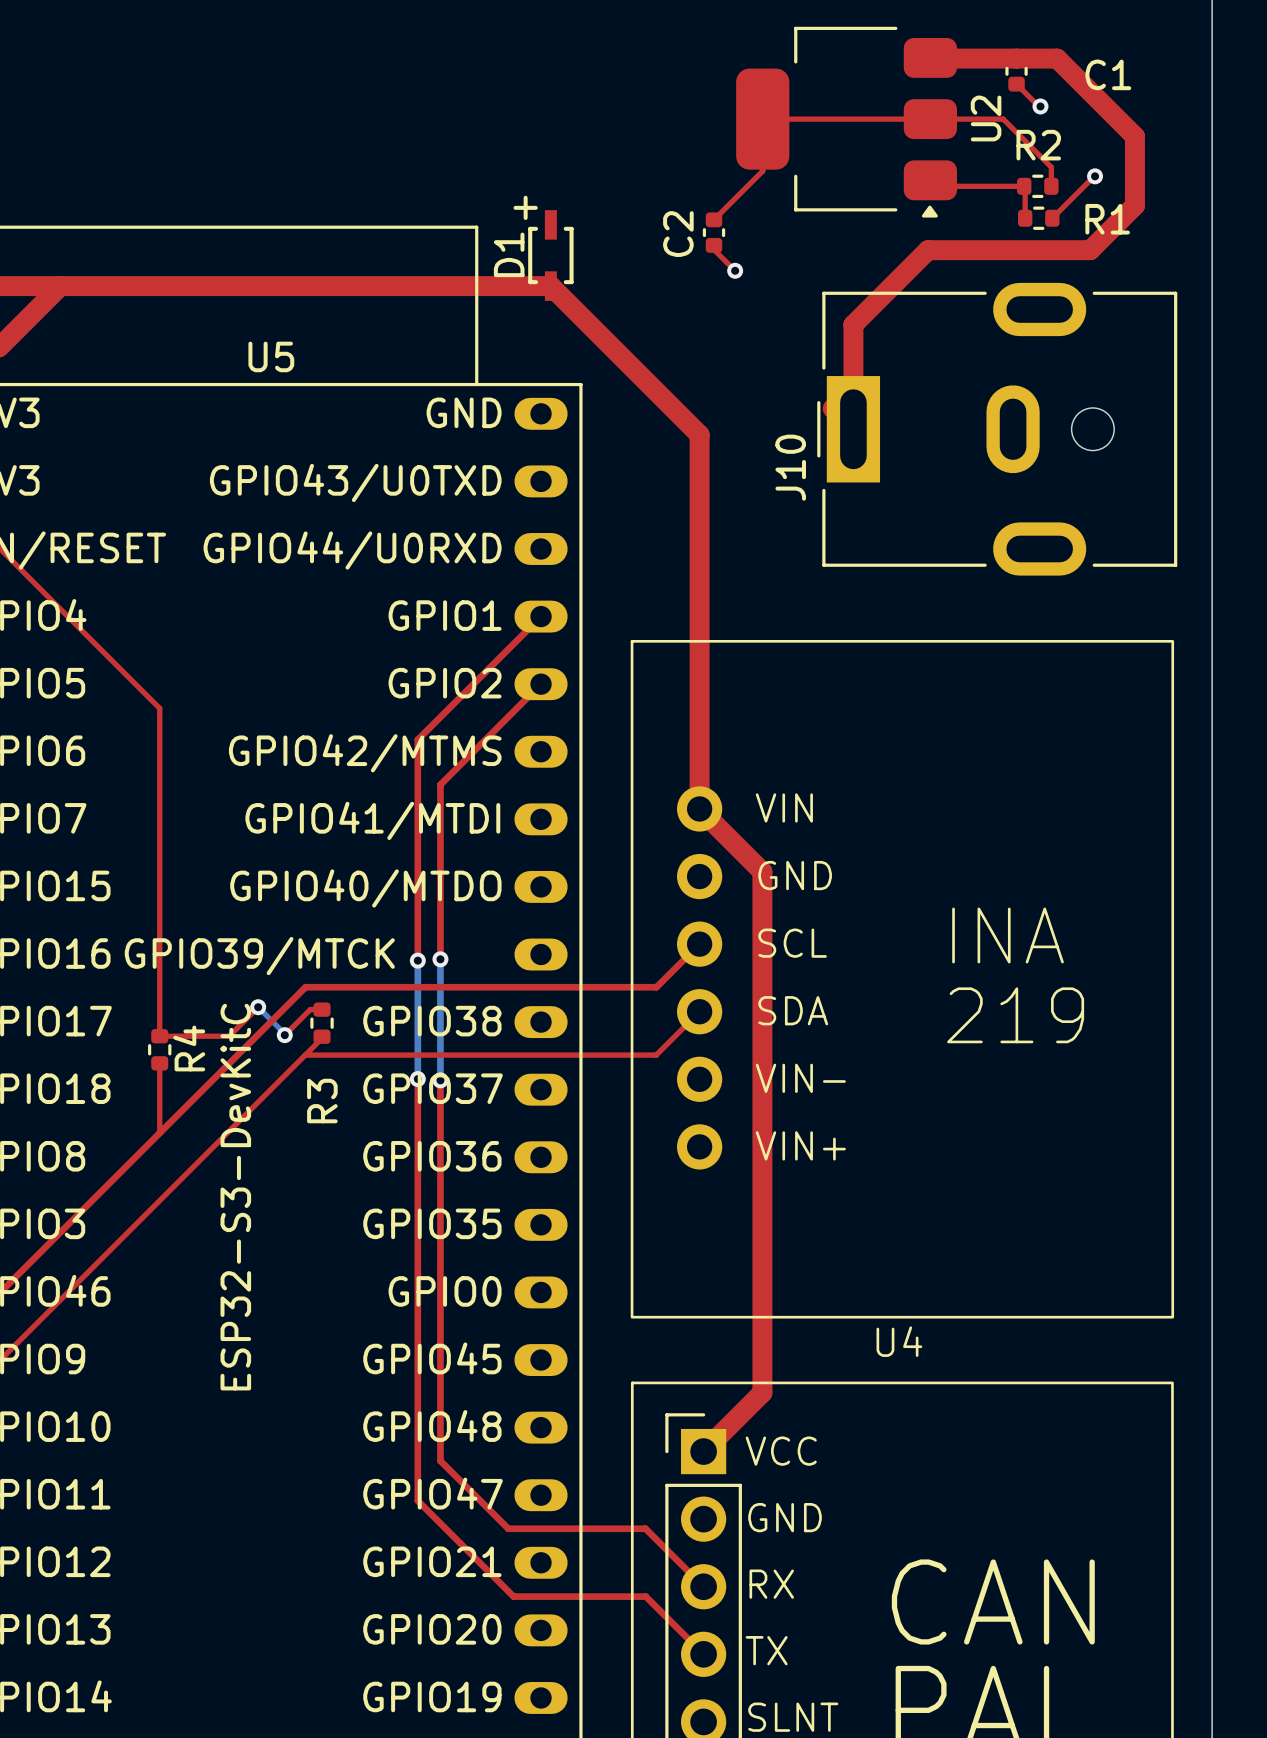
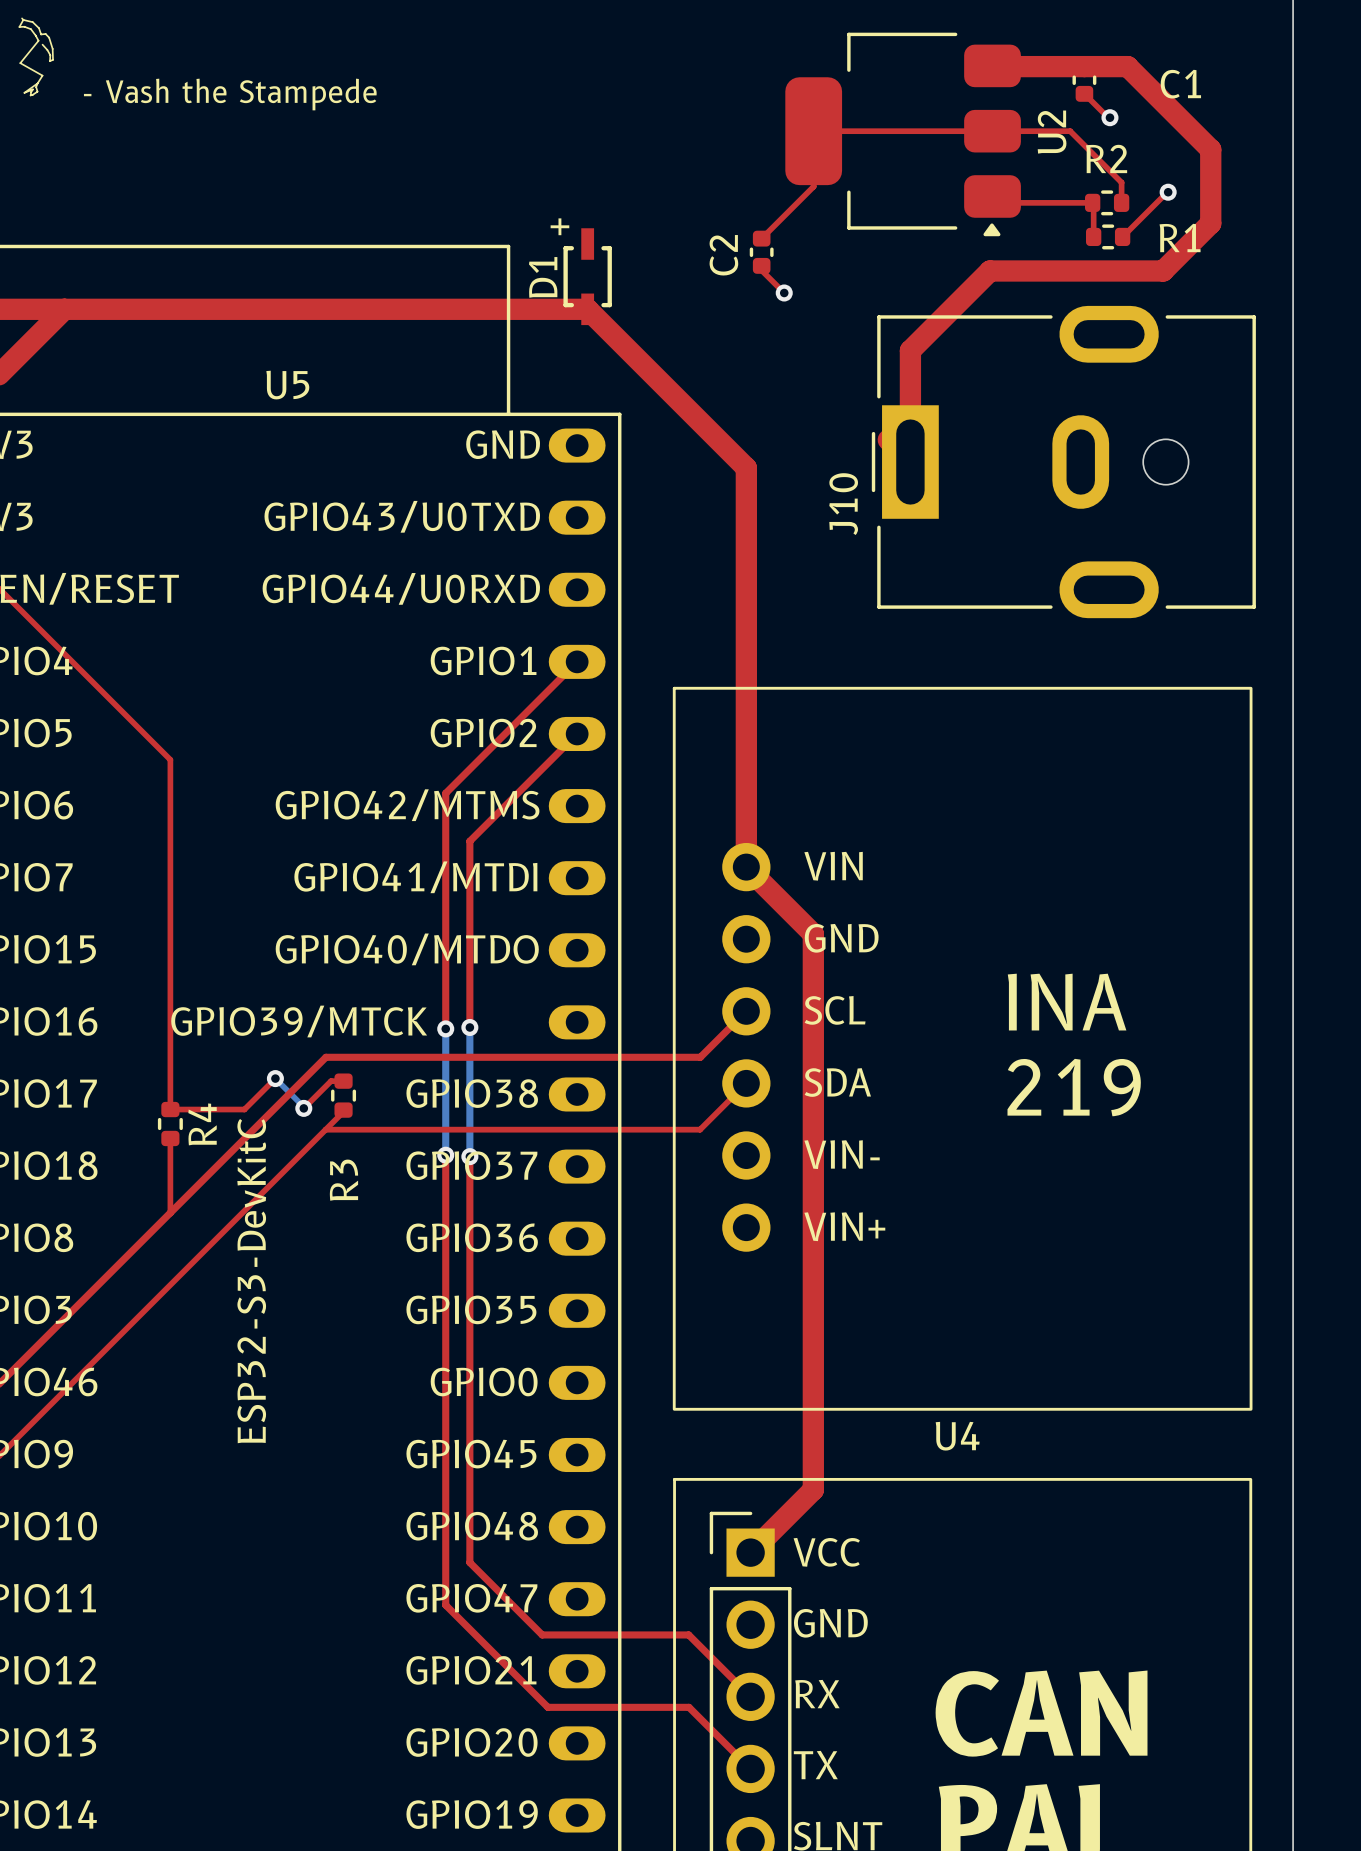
line: none -> (22, 18) (23, 19)
line: none -> (23, 19) (32, 22) (39, 28) (41, 34) (45, 33) (49, 37) (52, 48) (53, 59) (49, 61) (50, 55) (42, 44)
line: none -> (23, 19) (19, 27) (30, 29) (38, 40) (20, 63) (42, 75) (37, 83)
line: none -> (37, 83) (24, 92) (32, 89) (30, 95) (37, 91) (37, 83)
text: none -> - Vash the Stampede (230, 94)

